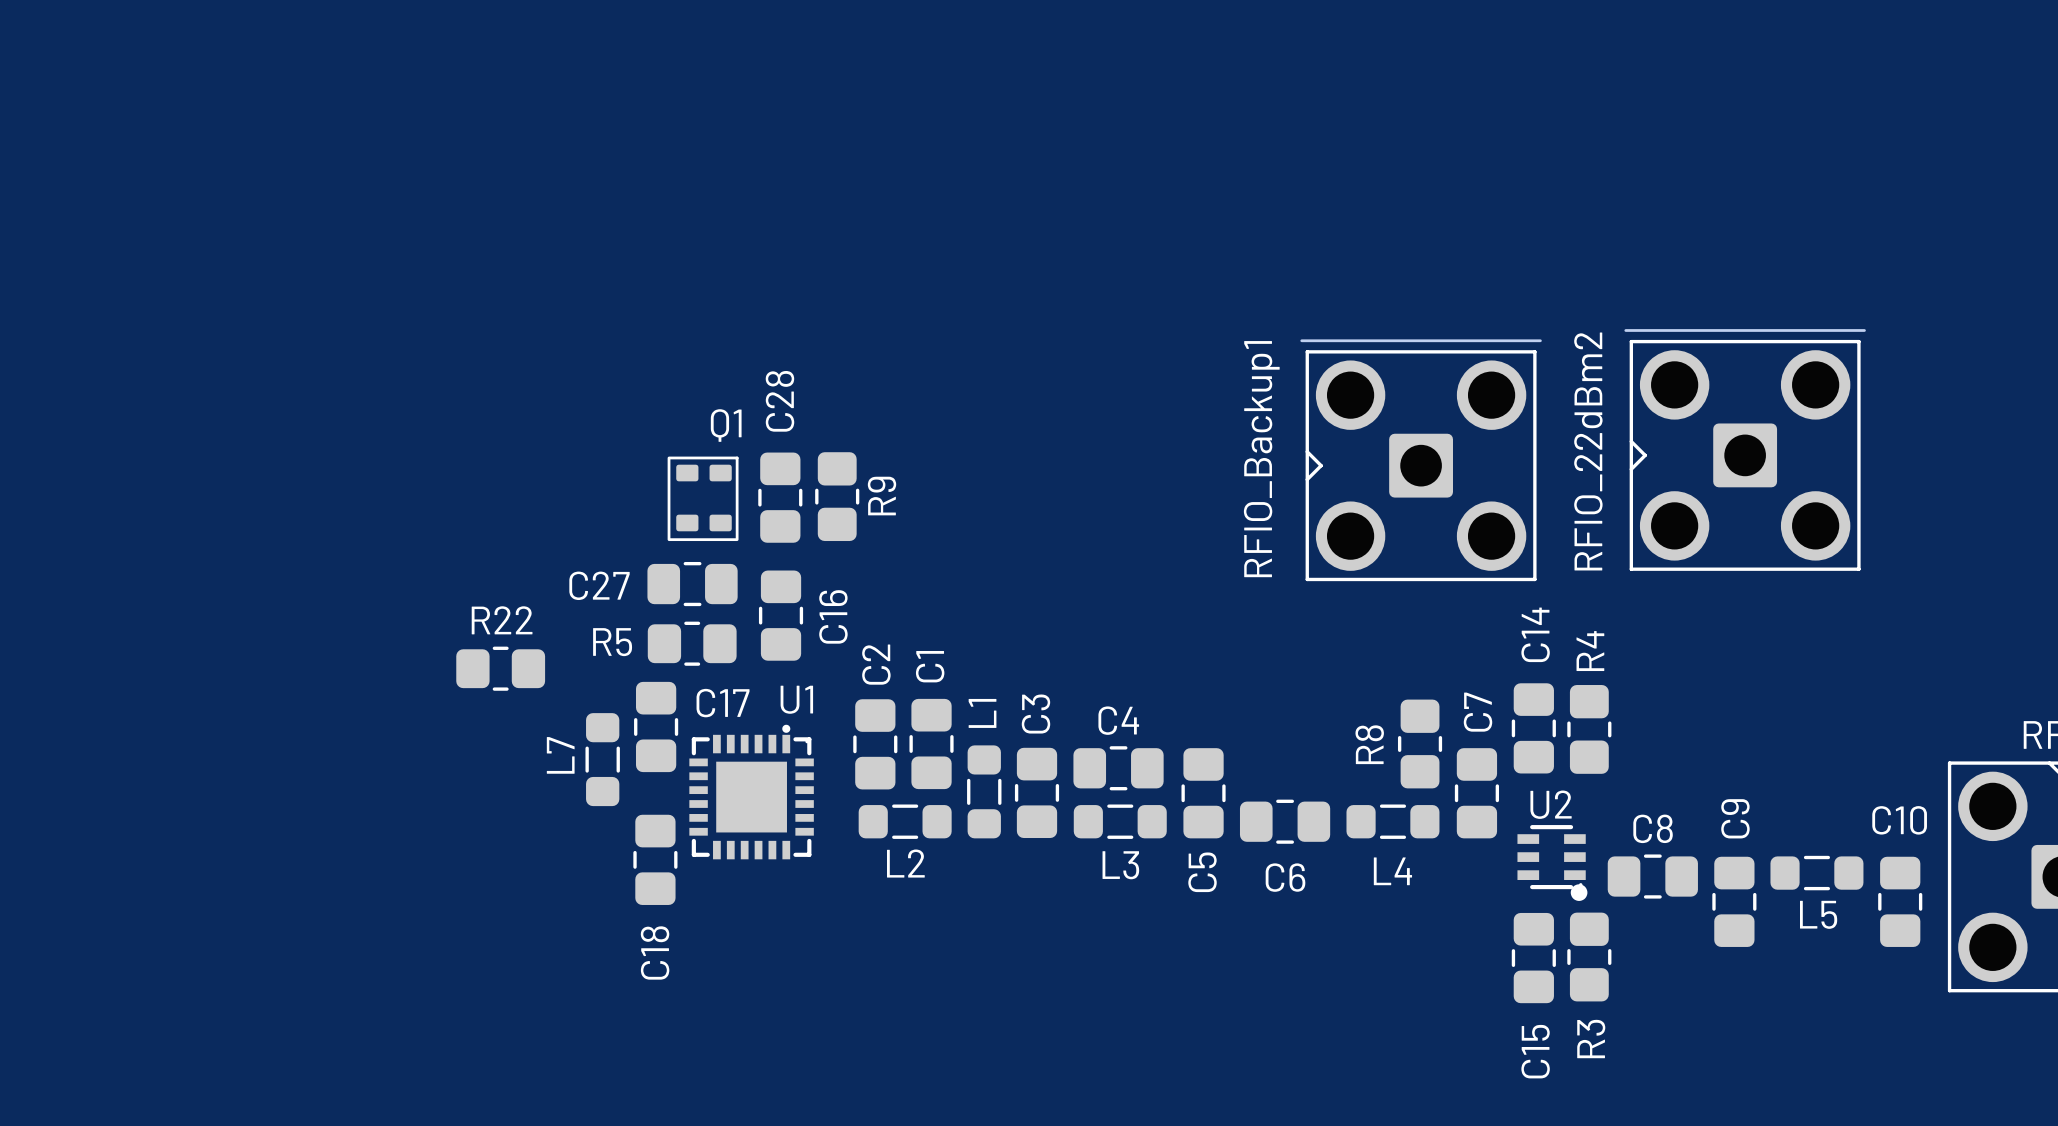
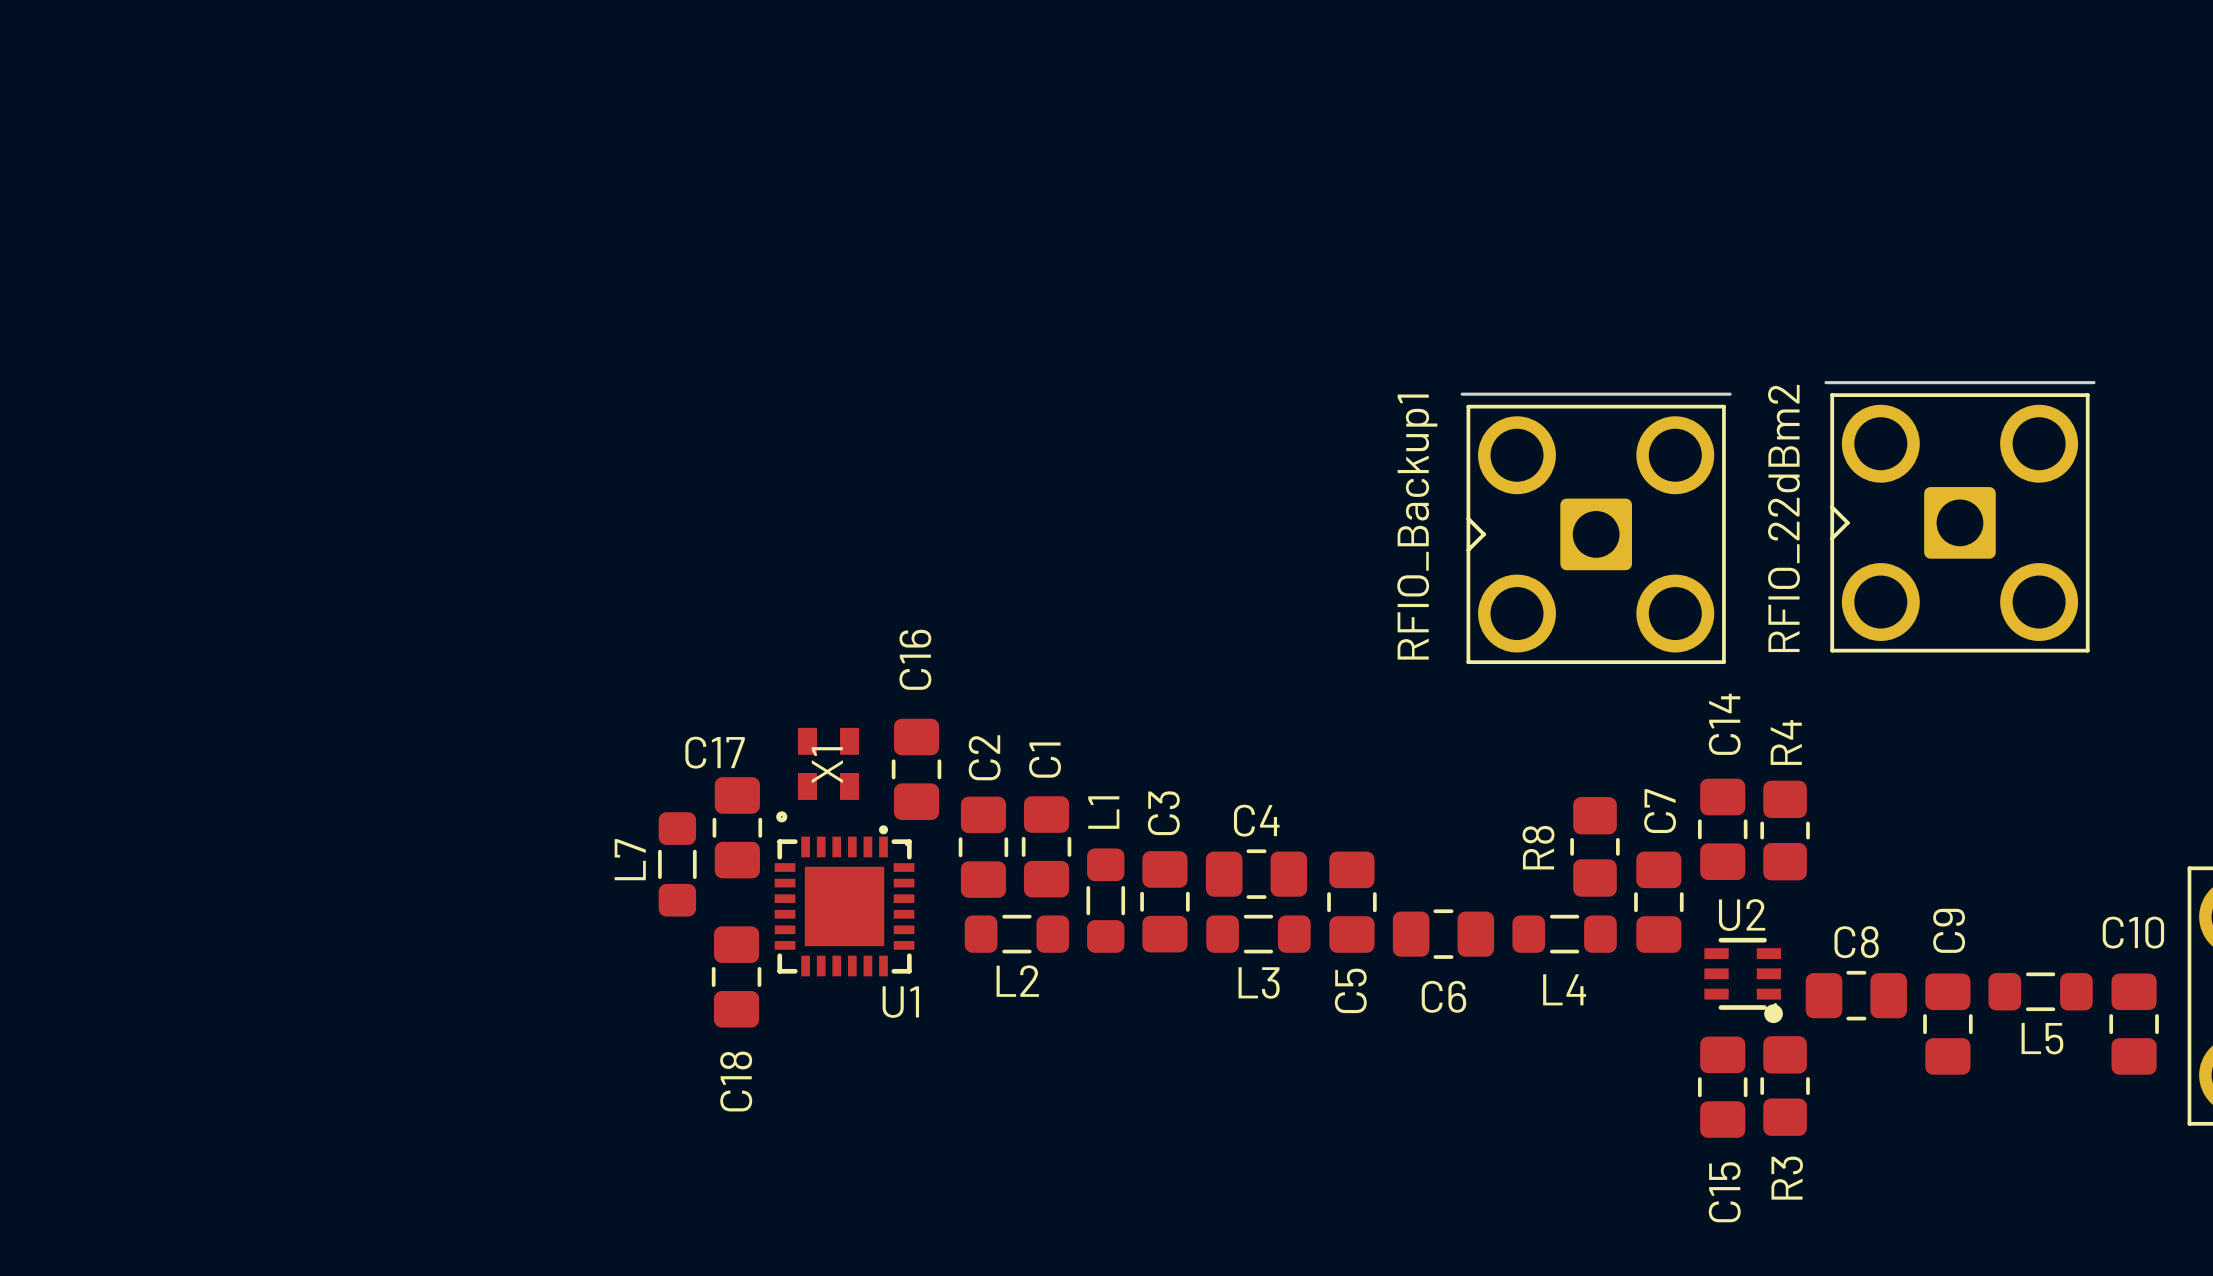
R9: (837, 496) -> none
C28: (780, 497) -> none
Q1: (703, 498) -> none
C27: (692, 584) -> none
C16 position: (781, 615) -> (916, 769)
C16 name position: C16 (833, 616) -> C16 (915, 659)
R5: (692, 643) -> none
R22: (500, 668) -> none
X1: none -> (817, 775)
U1 name position: U1 (796, 699) -> U1 (900, 1002)
C17 name position: C17 (723, 703) -> C17 (715, 752)

